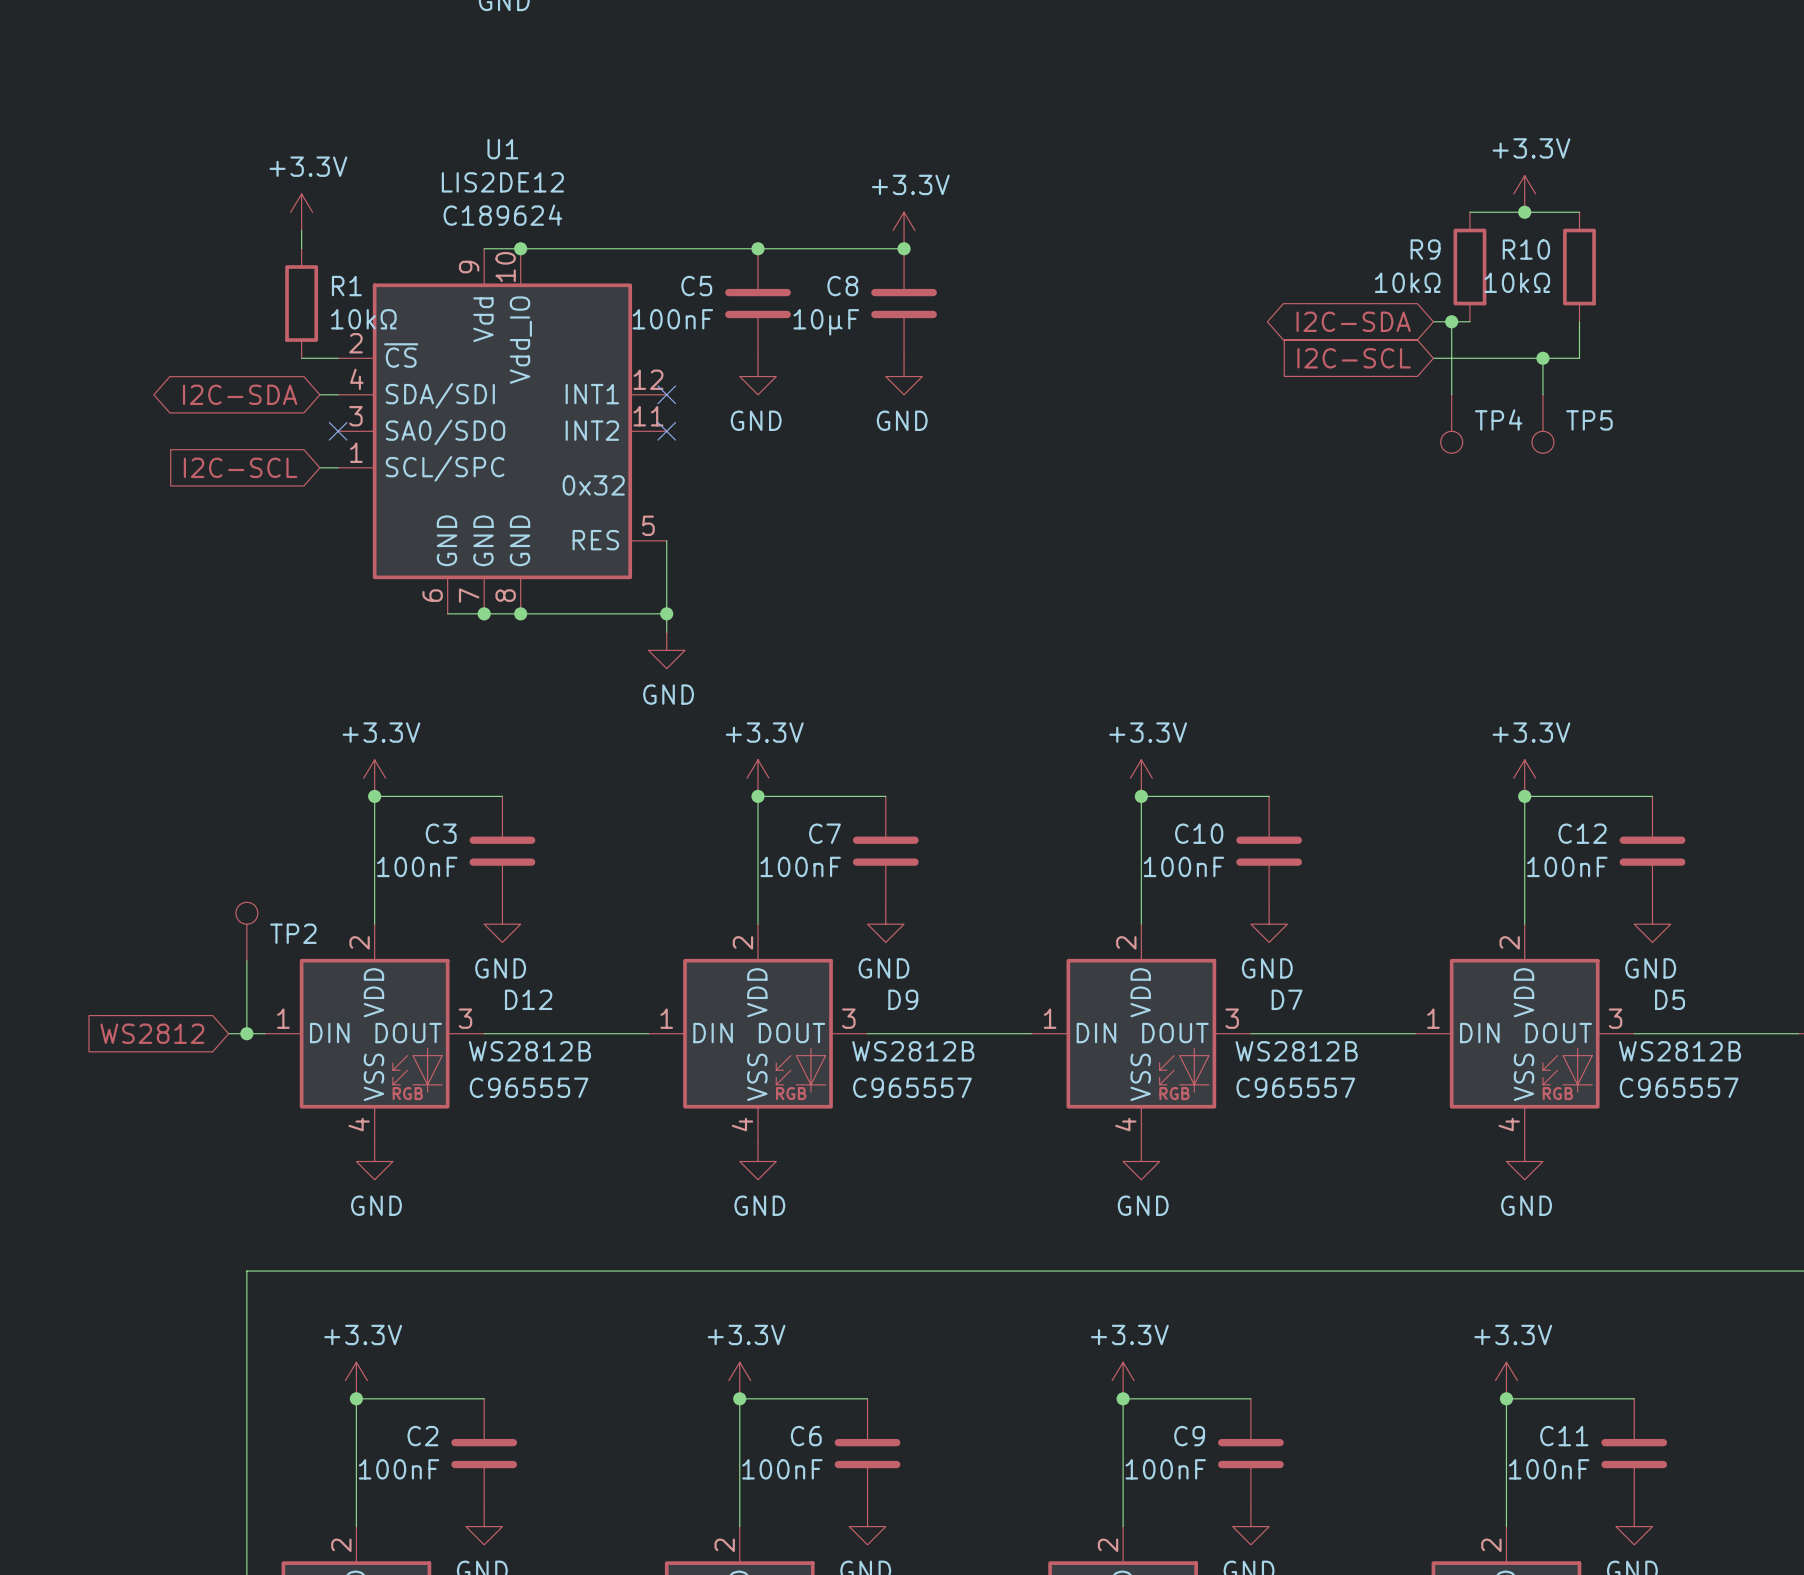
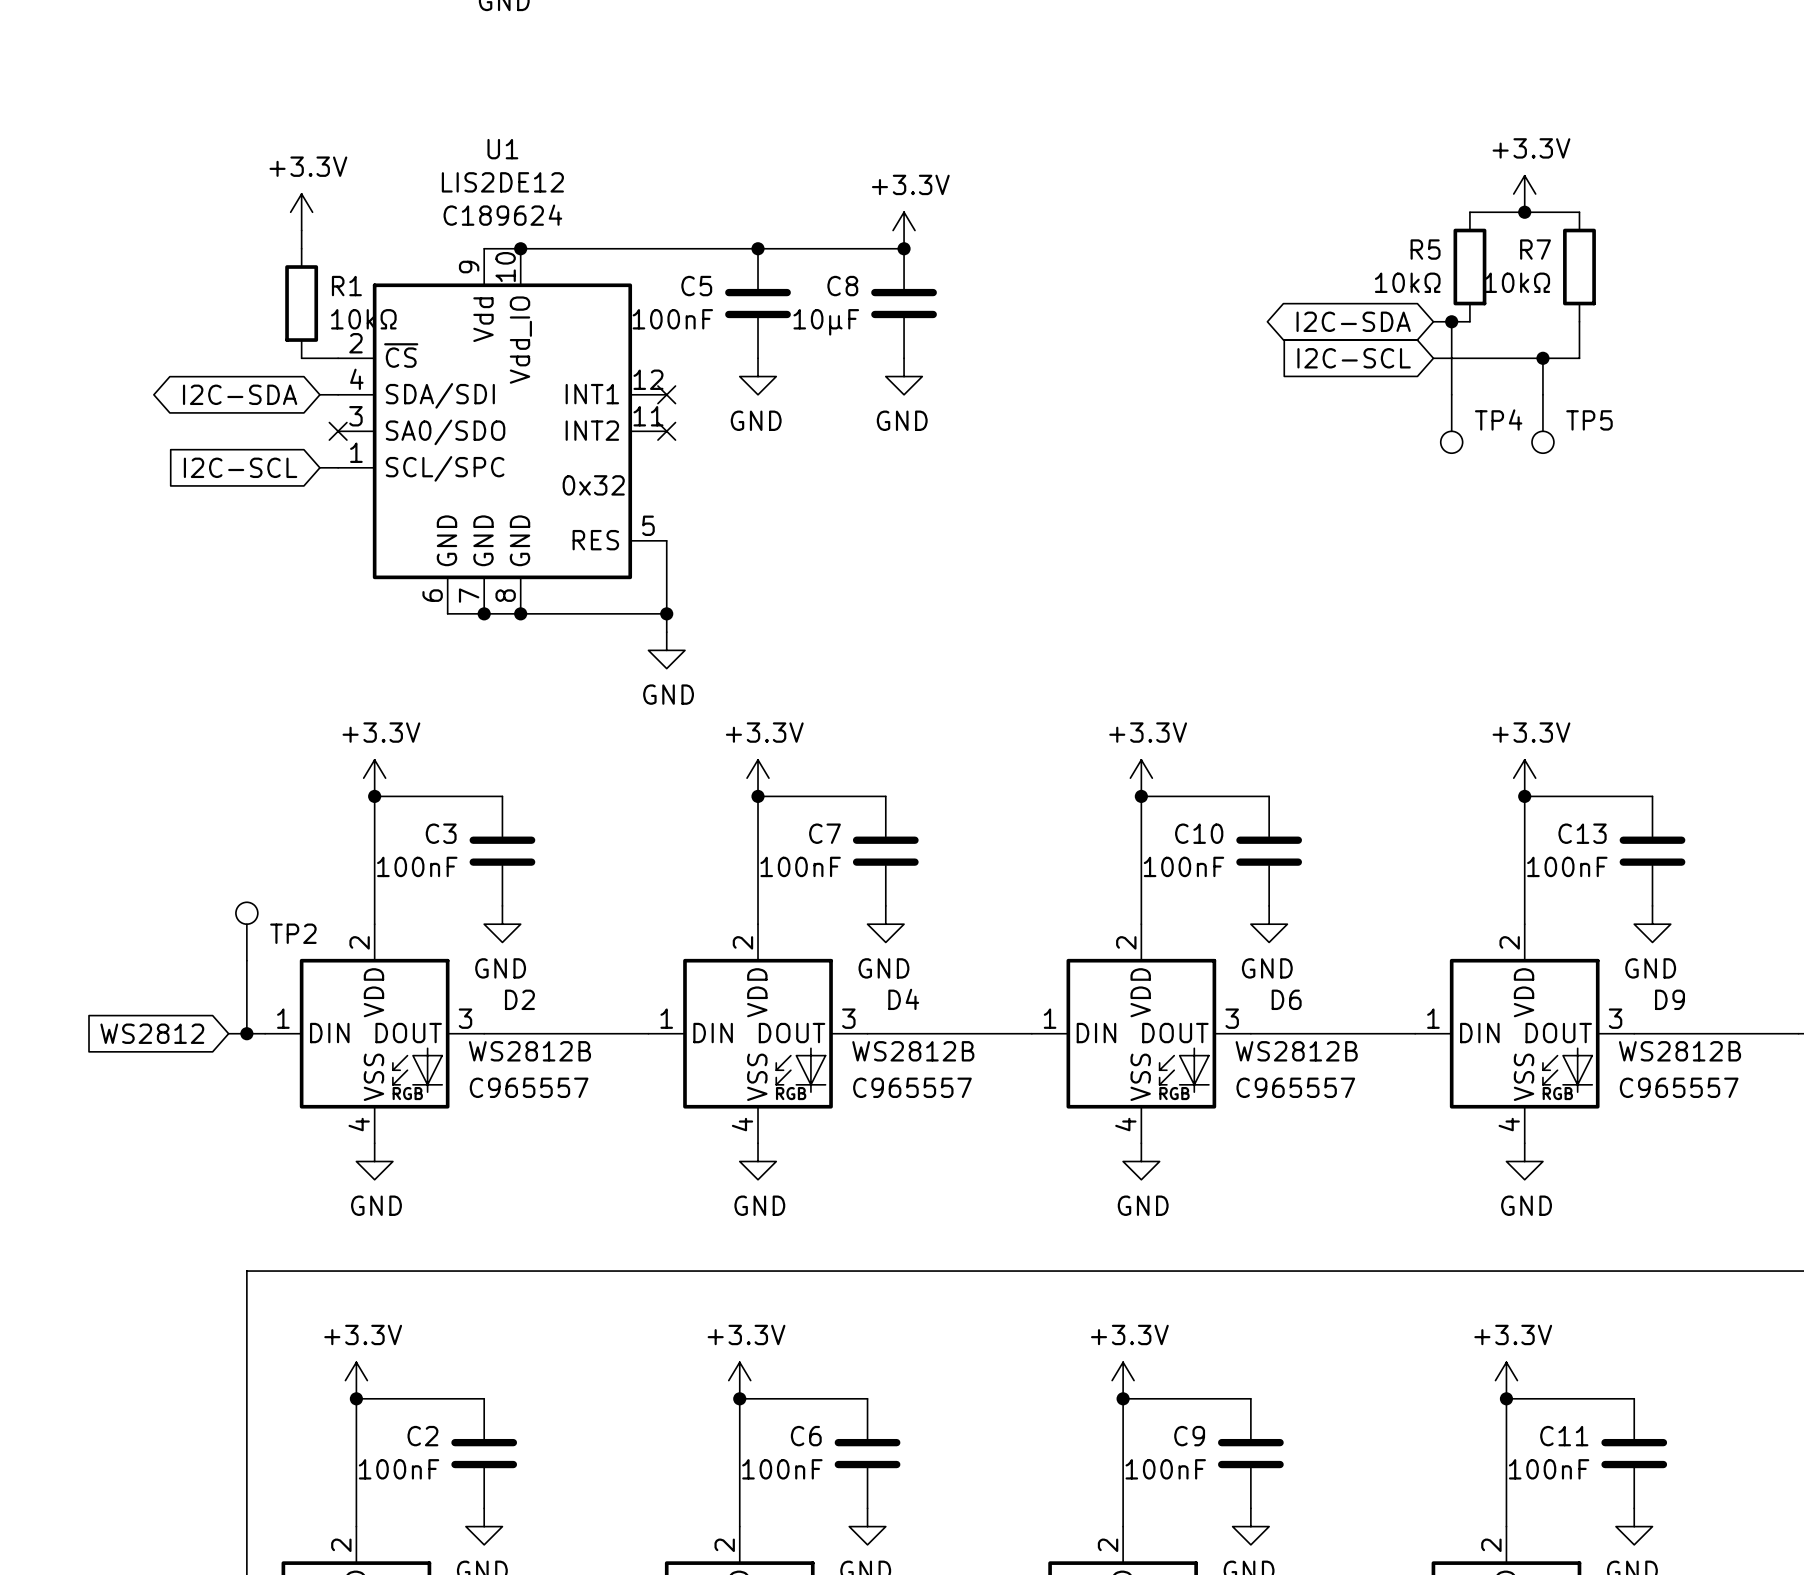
R9 name: R9 (1425, 249) -> R5 (1425, 249)
R10 name: R10 (1526, 249) -> R7 (1535, 249)
C12 name: C12 (1582, 833) -> C13 (1582, 833)
D12 name: D12 (528, 999) -> D2 (519, 999)
D9 name: D9 (903, 999) -> D4 (903, 999)
D7 name: D7 (1287, 999) -> D6 (1286, 999)
D5 name: D5 (1670, 999) -> D9 (1670, 999)

